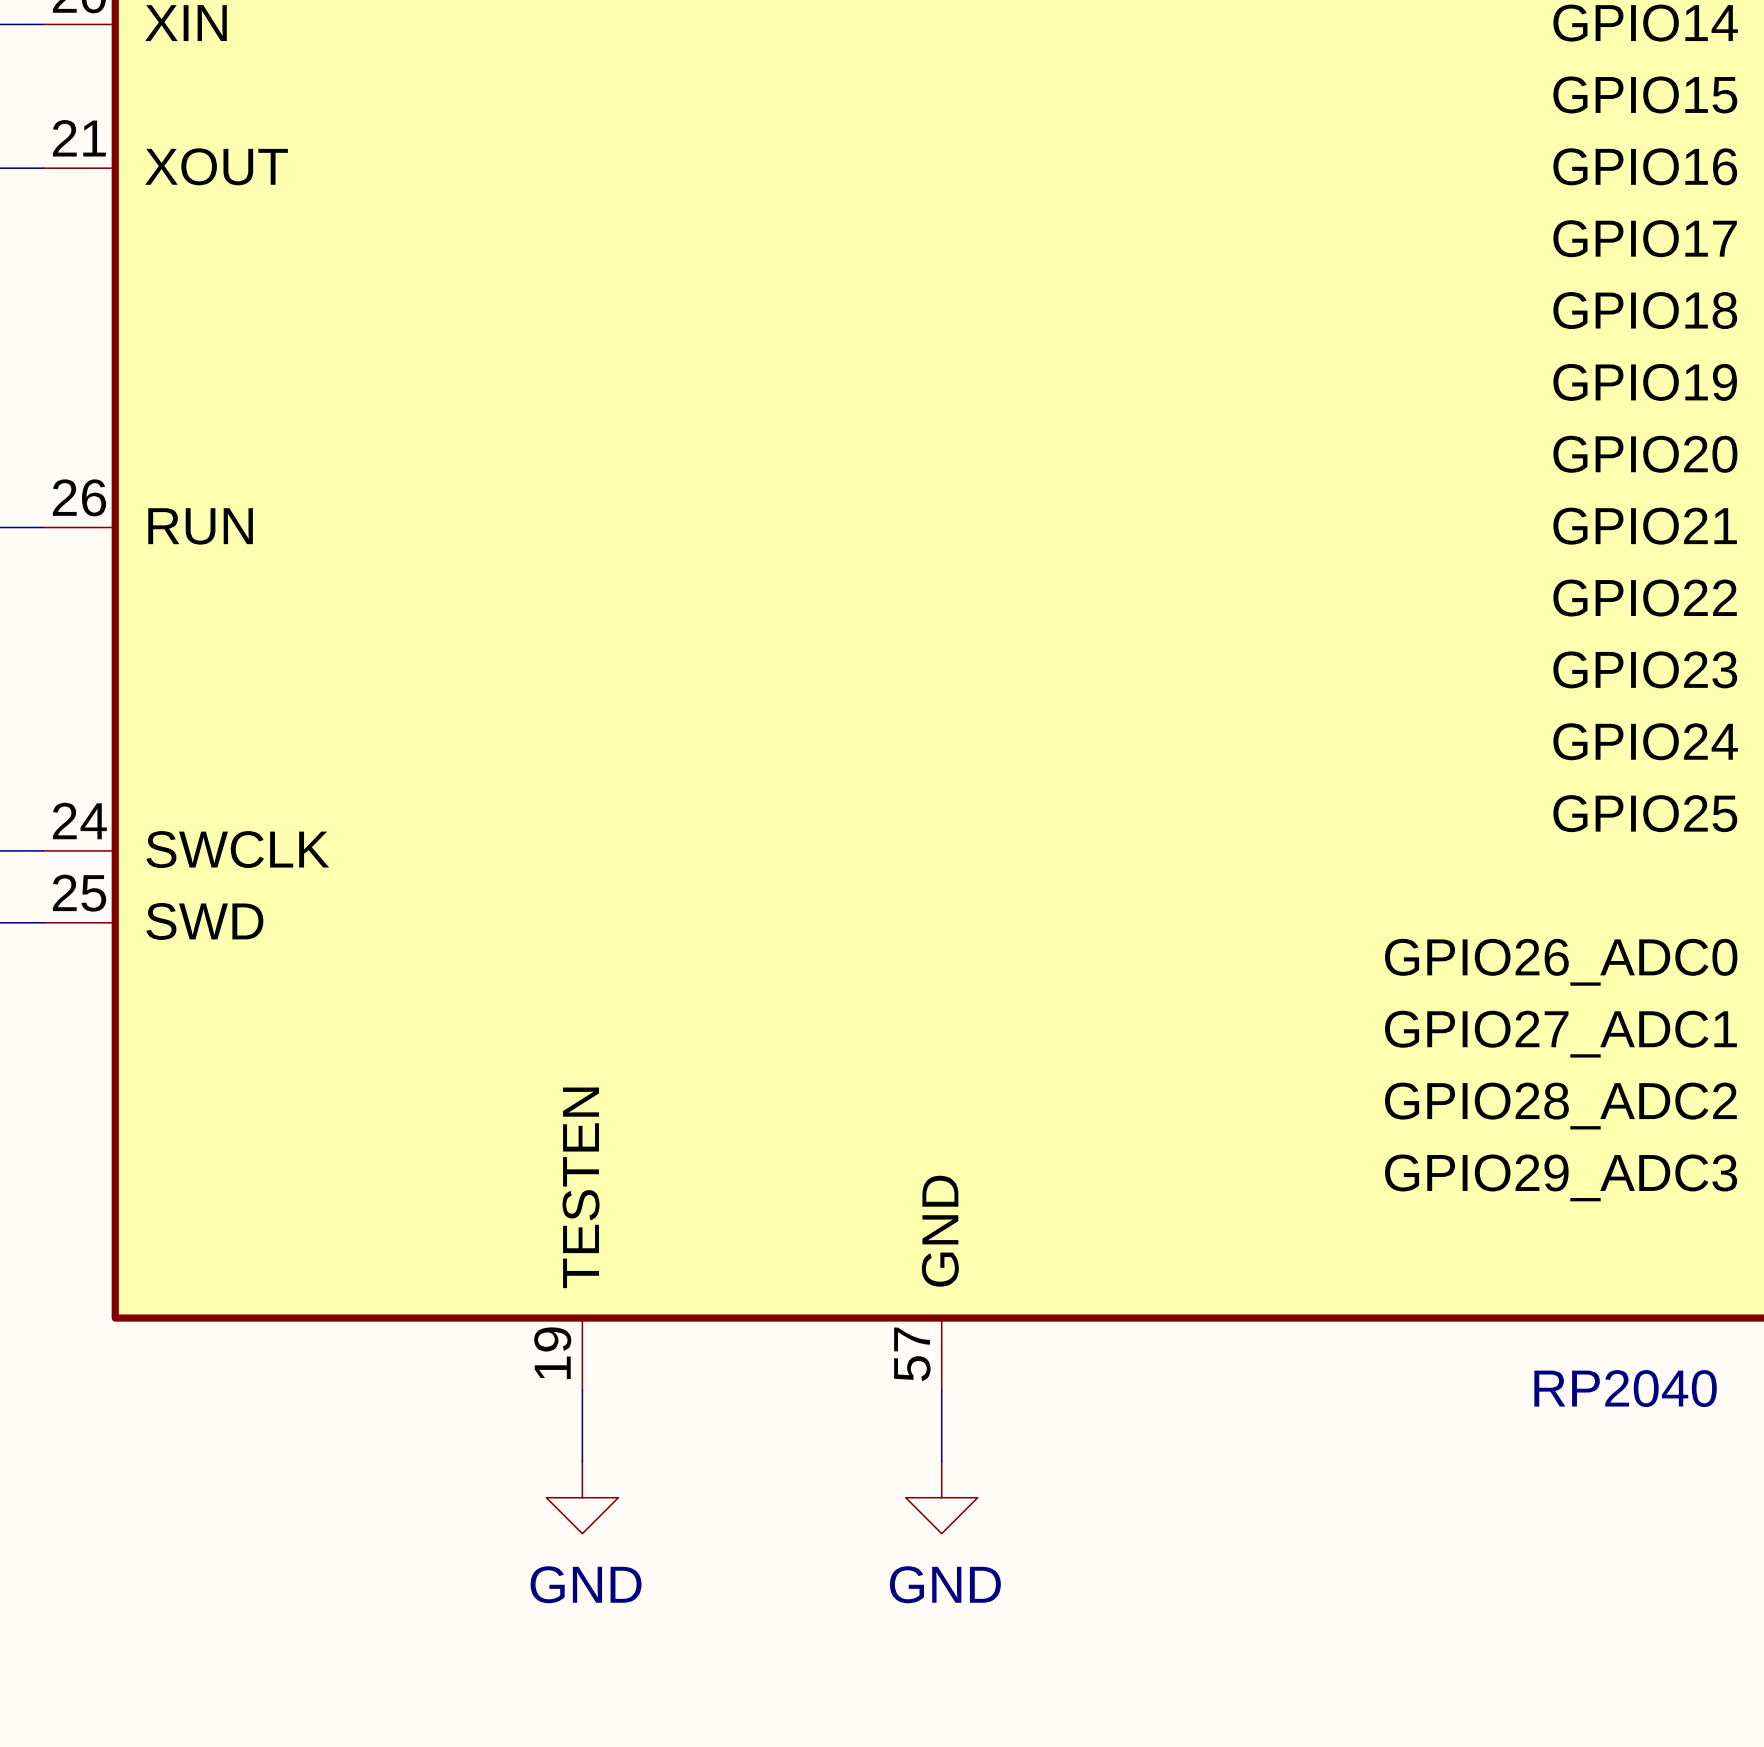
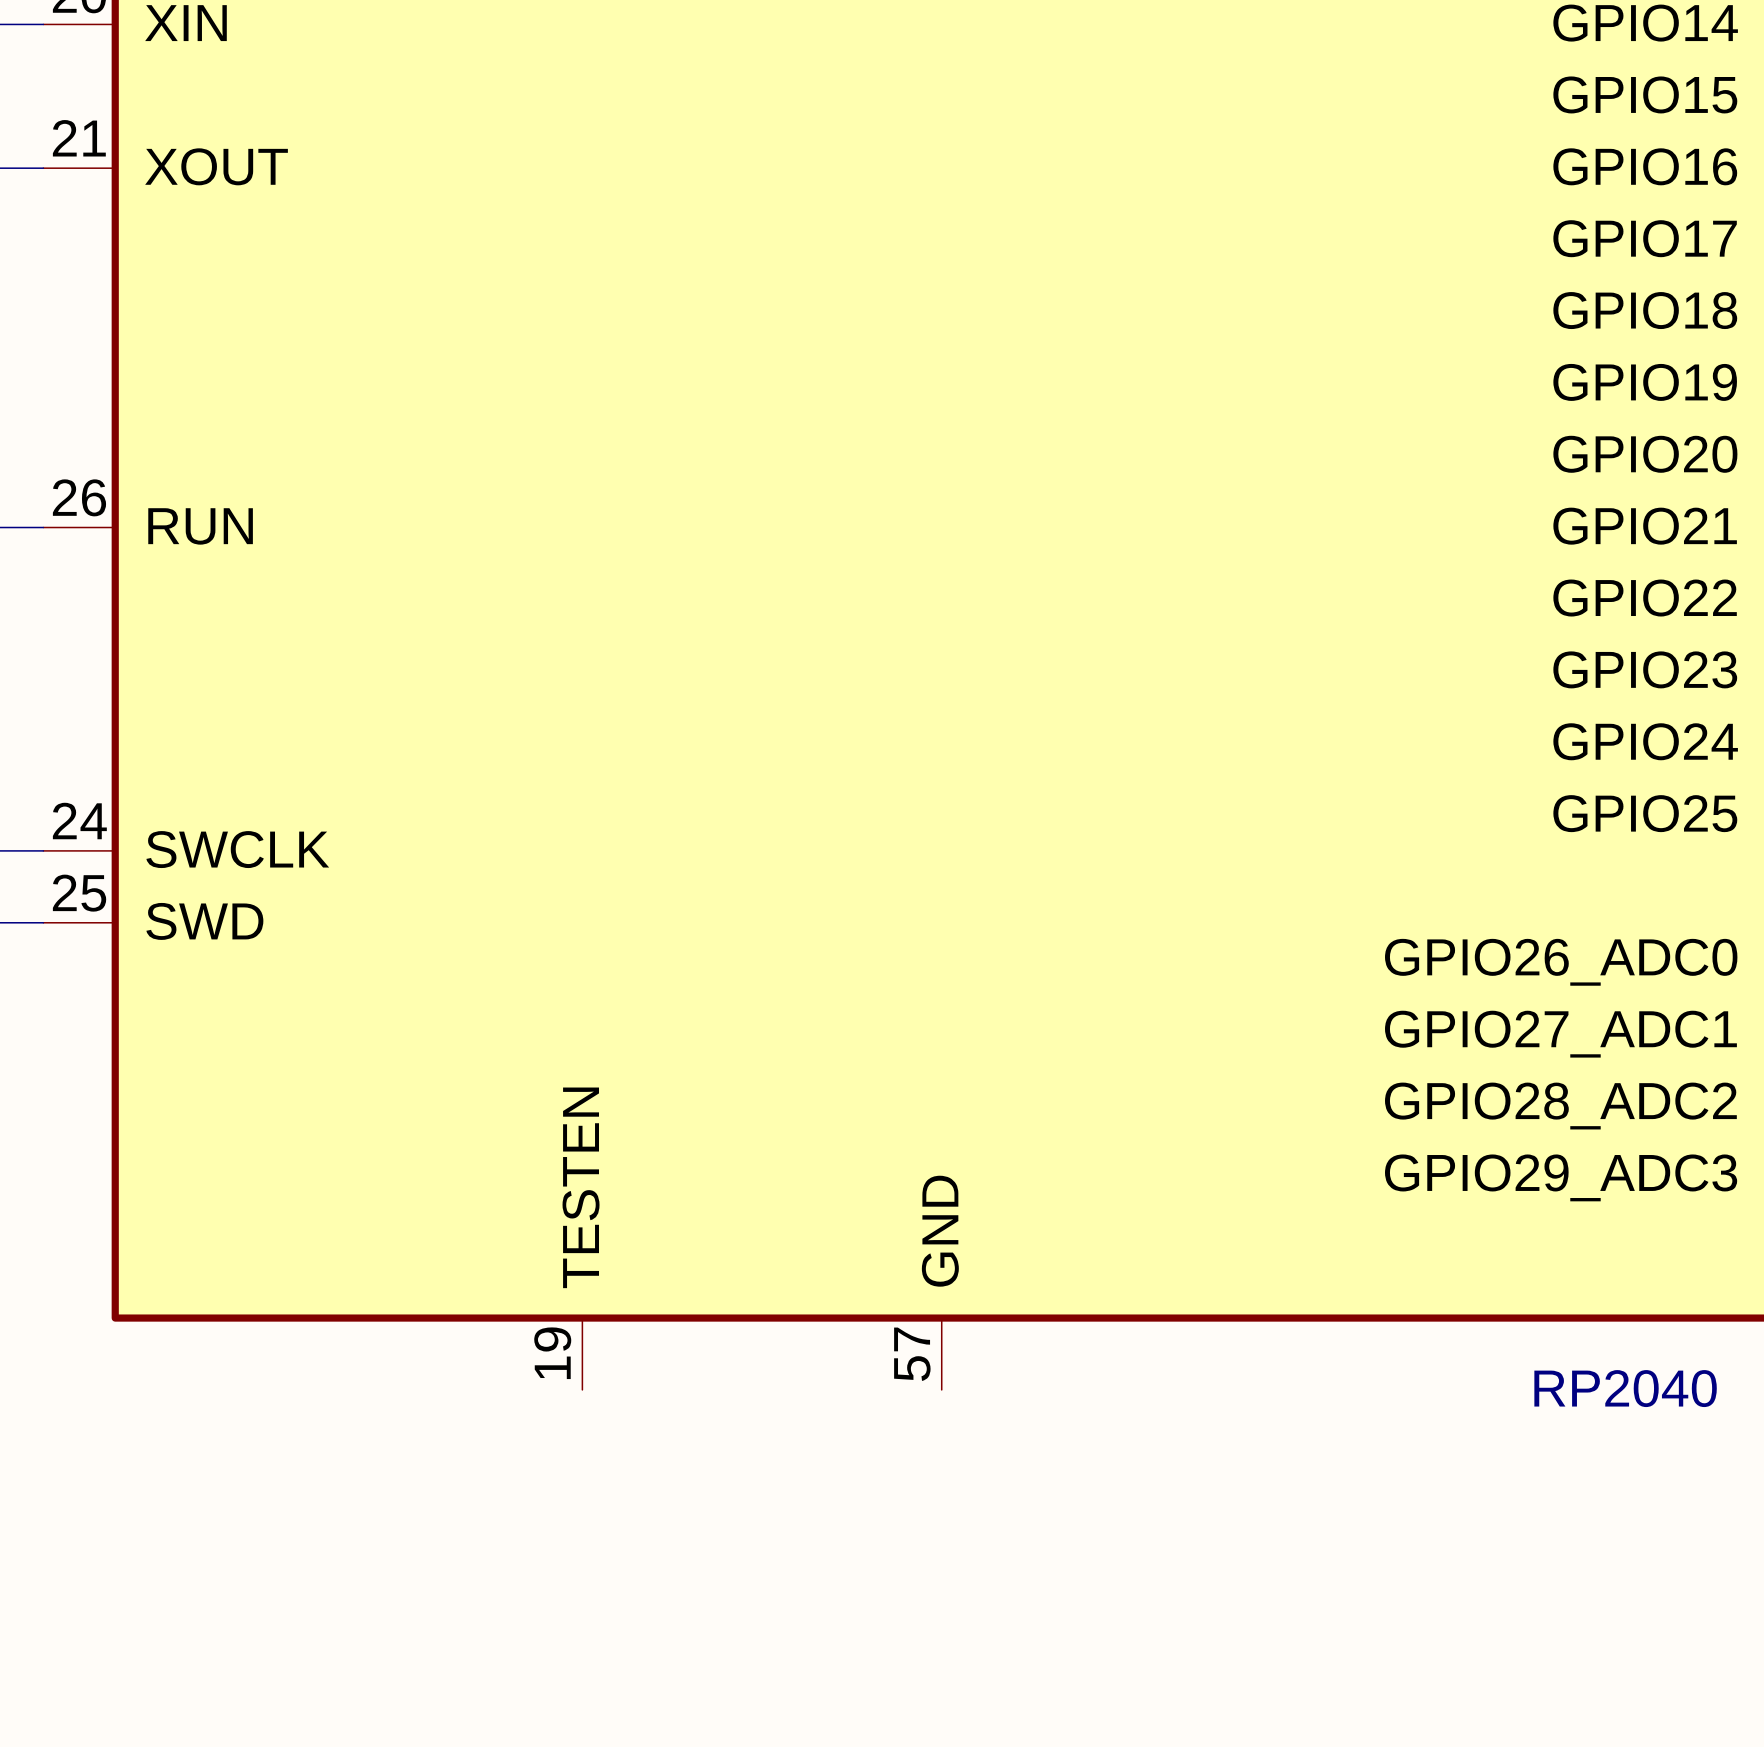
wire: (582, 1389) (582, 1461) -> none
wire: (941, 1389) (941, 1461) -> none
power symbol: GND (582, 1497) -> none
power symbol: GND (941, 1497) -> none

